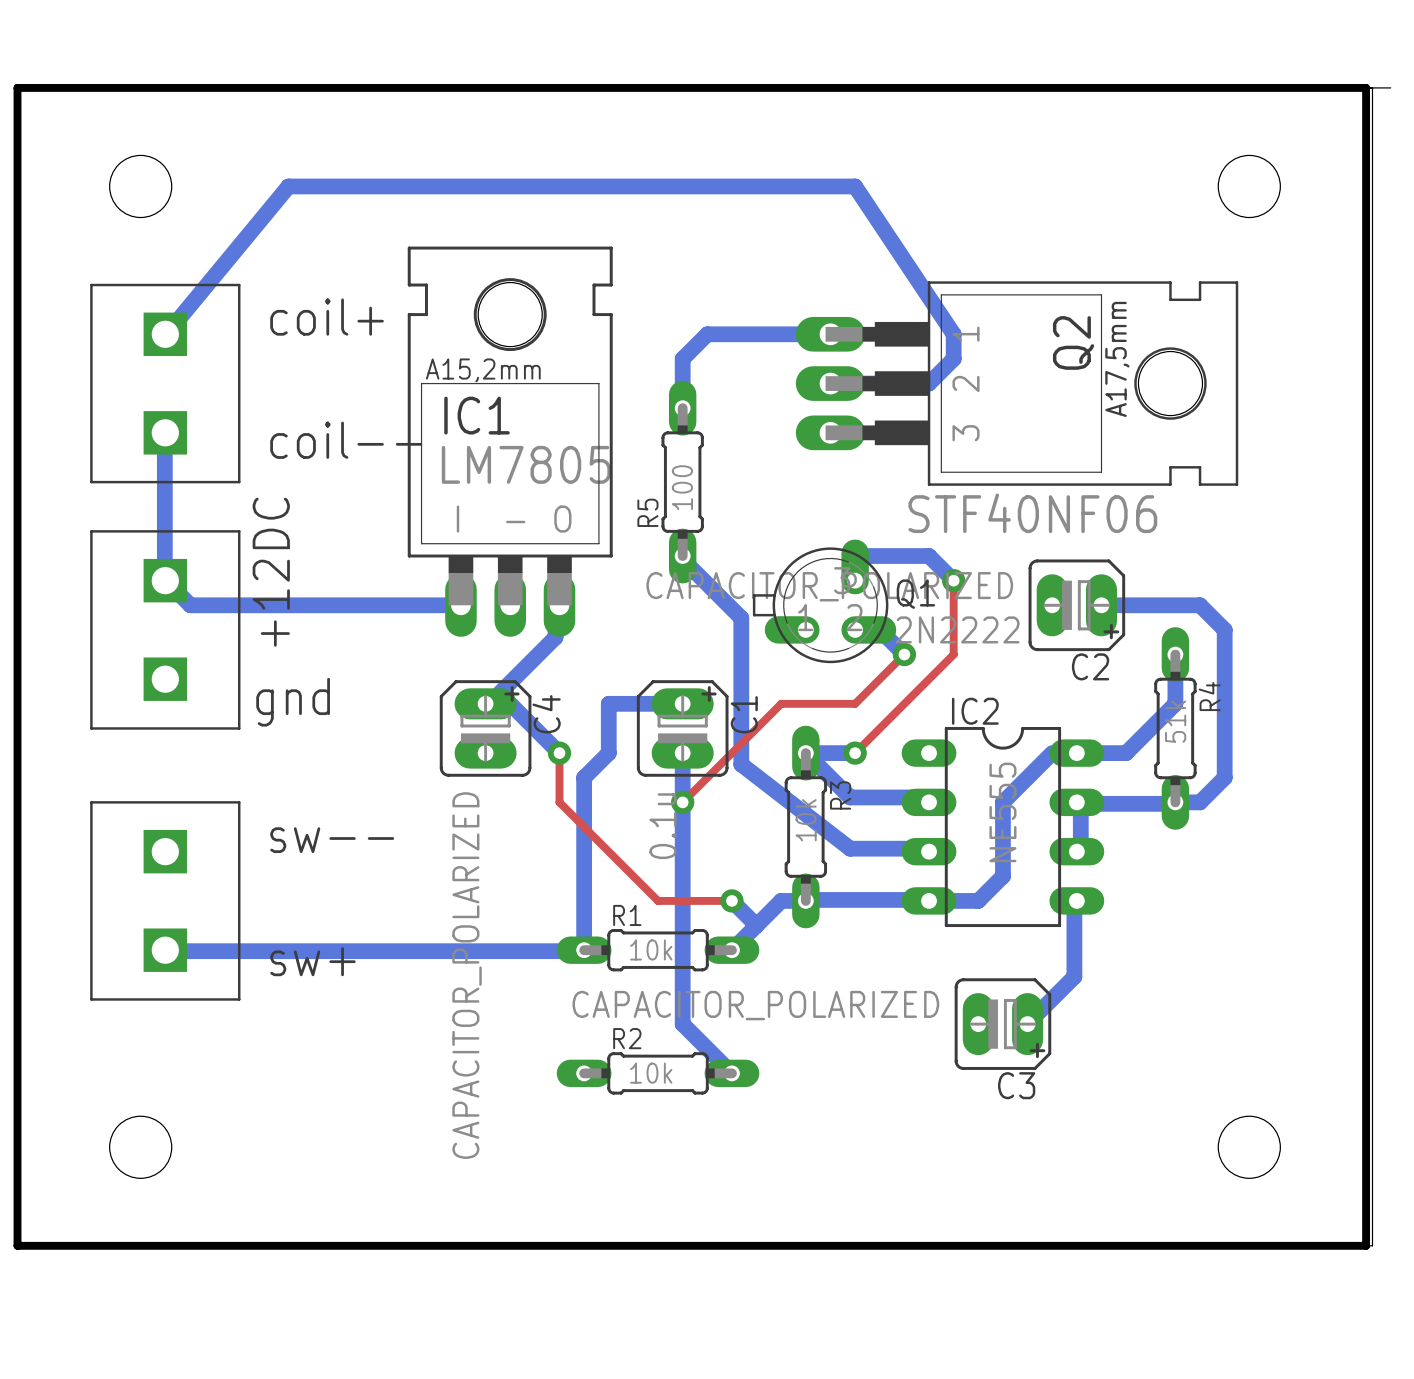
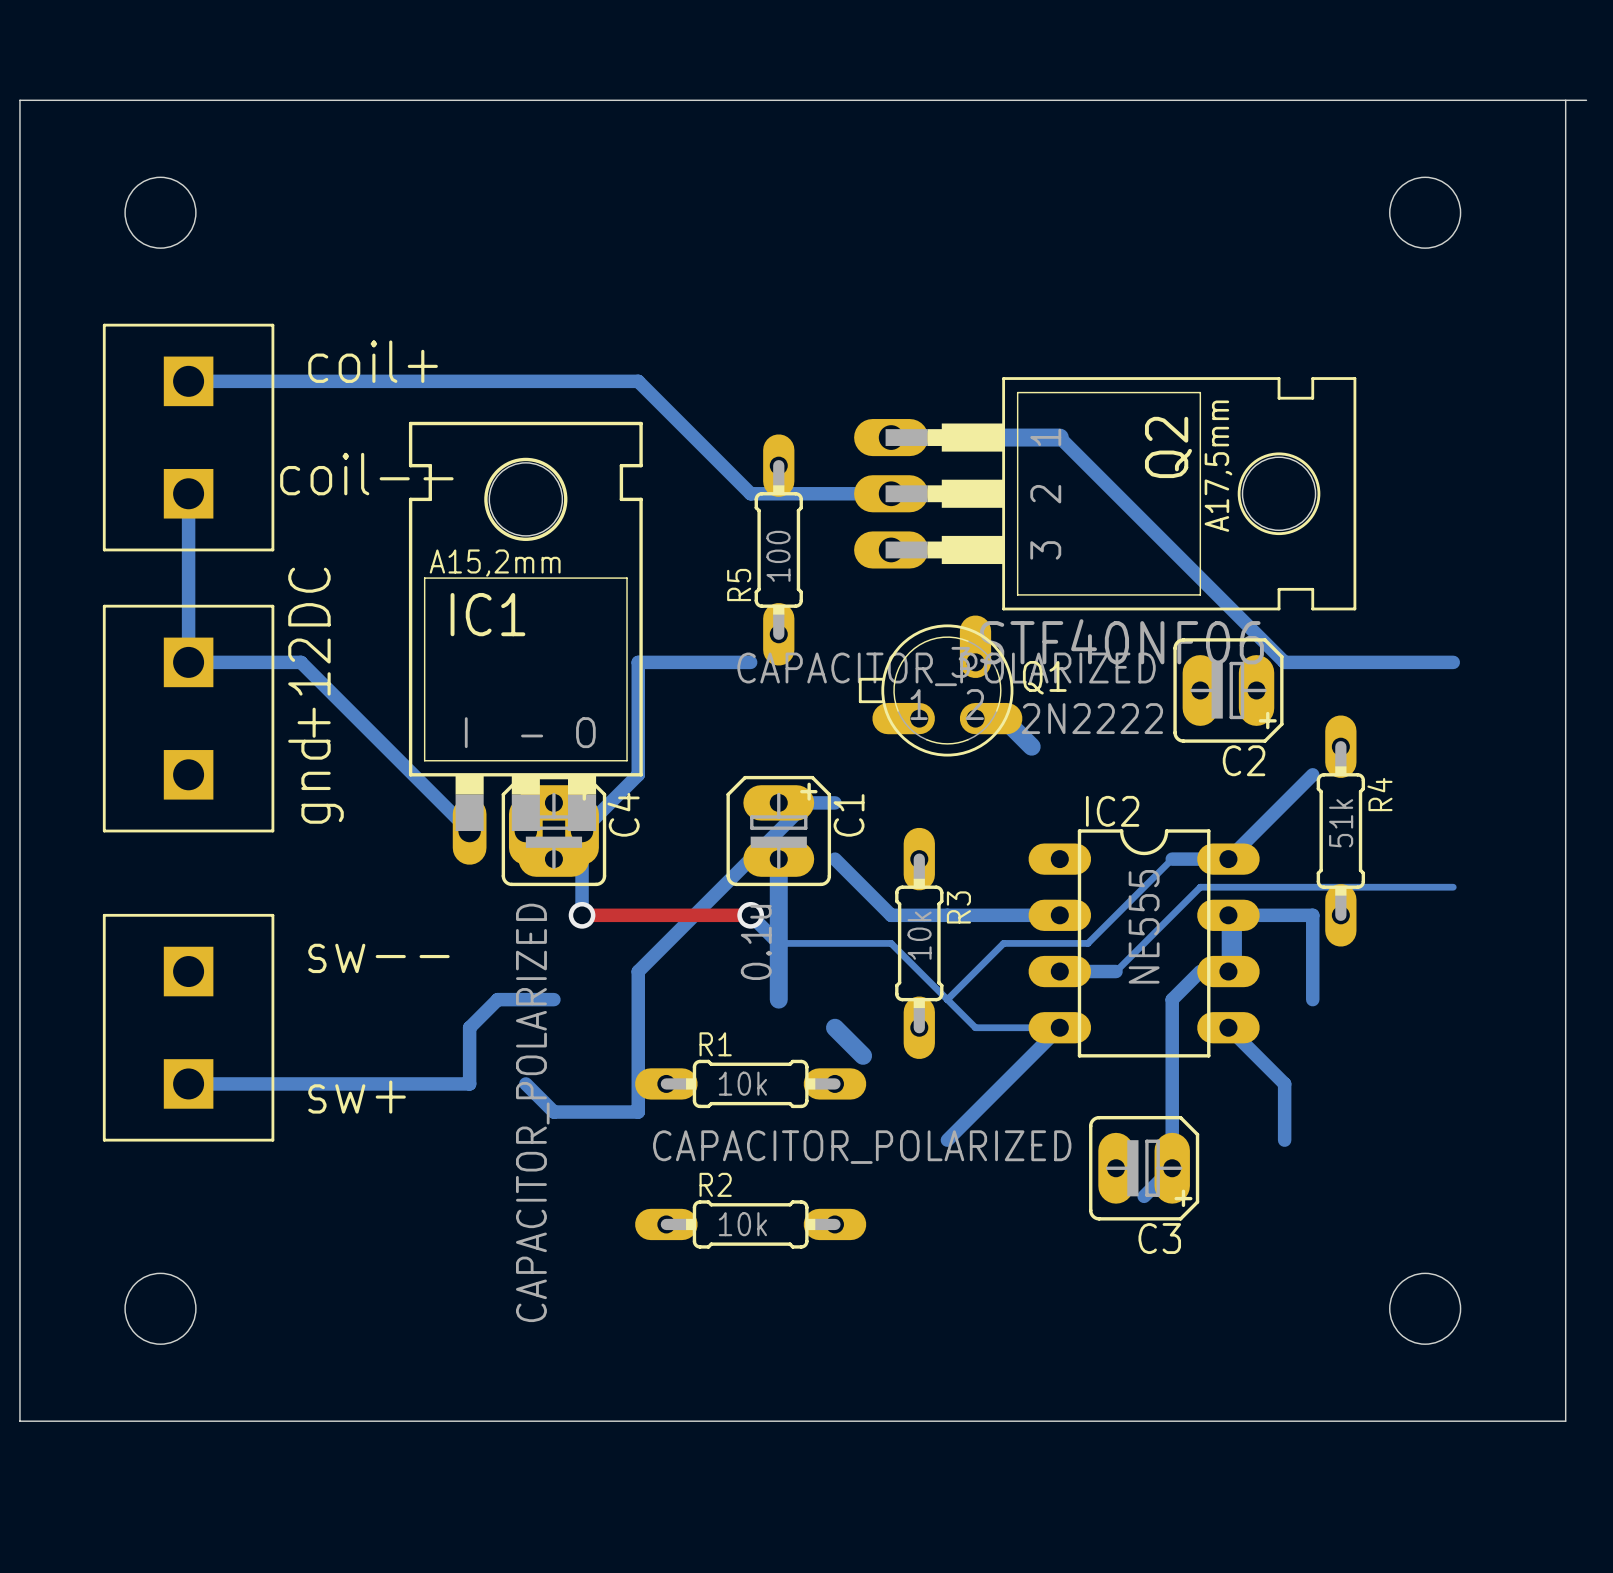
board edge: (17, 87) (17, 1245) (1366, 1245) (1366, 87) (17, 87) -> none
IC1 footprint: [407, 246, 613, 637] -> [408, 421, 643, 865]
Q2 footprint: [795, 281, 1239, 486] -> [854, 377, 1357, 611]
bottom track: (165, 334) (171, 336) (171, 328) (288, 186) (855, 186) (953, 334) (953, 358) (929, 383) -> (188, 381) (638, 381) (750, 493) (891, 493)
bottom track: (855, 334) (707, 334) (682, 358) (682, 408) -> none
bottom track: none -> (1059, 437) (1284, 662) (1453, 662)
bottom track: (165, 432) (164, 579) (190, 605) (460, 605) -> (188, 493) (188, 662) (301, 662) (469, 831)
text position: coil-- (346, 440) -> coil-- (366, 474)
IC1 value: LM7805 (526, 464) -> none
bottom track: (682, 556) (683, 560) (741, 618) (741, 764) (850, 848) (927, 848) (929, 851) -> (1453, 887) (1200, 887) (1116, 971) (1059, 971)
bottom track: none -> (750, 662) (638, 662) (638, 774) (582, 831) (582, 915)
bottom track: (855, 580) (855, 556) (929, 556) (953, 580) -> none
top track: (953, 580) (953, 654) (855, 753) -> none
via: (953, 580) -> none
bottom track: (559, 605) (555, 605) (555, 637) (491, 701) -> none
bottom track: (1101, 605) (1200, 605) (1224, 629) (1224, 777) (1200, 802) (1080, 803) -> none
top track: (904, 654) (855, 703) (781, 703) (682, 802) -> none
via: (904, 654) -> none
bottom track: (1175, 654) (1175, 703) (1126, 753) (1076, 753) -> (1312, 774) (1228, 859)
bottom track: (491, 701) (507, 701) (559, 753) -> none
bottom track: (677, 701) (682, 703) (608, 703) (608, 753) (584, 777) (584, 950) -> none
text rotation: 0° (293, 702) -> 90° counterclockwise (315, 781)
bottom track: none -> (834, 802) (806, 802) (638, 971) (638, 1112) (553, 1112) (525, 1083)
top track: (559, 753) (559, 802) (658, 900) (731, 900) -> none
via: (559, 753) -> none
bottom track: (855, 753) (805, 753) (850, 797) (927, 797) (929, 802) -> (834, 859) (891, 915) (1059, 915)
via: (855, 753) -> none
bottom track: (1052, 753) (1002, 802) (1002, 876) (978, 900) (781, 900) (731, 950) -> (1200, 859) (1172, 859) (1087, 943) (1003, 943) (947, 999)
top track: none -> (582, 915) (750, 915)
via: none -> (582, 915)
bottom track: none -> (750, 915) (778, 943) (891, 943) (975, 1027) (1059, 1027) (947, 1140)
via: none -> (750, 915)
via: (682, 802) -> none
bottom track: (682, 876) (682, 1024) (731, 1073) -> none
bottom track: none -> (1312, 999) (1312, 915) (1228, 915) (1228, 971) (1200, 971) (1172, 999) (1172, 1168) (1144, 1196)
via: (731, 900) -> none
bottom track: (1076, 900) (1074, 906) (1074, 976) (1027, 1024) -> (1228, 1027) (1284, 1083) (1284, 1140)
bottom track: (165, 950) (584, 950) -> (188, 1083) (469, 1083) (469, 1027) (497, 999) (553, 999)

